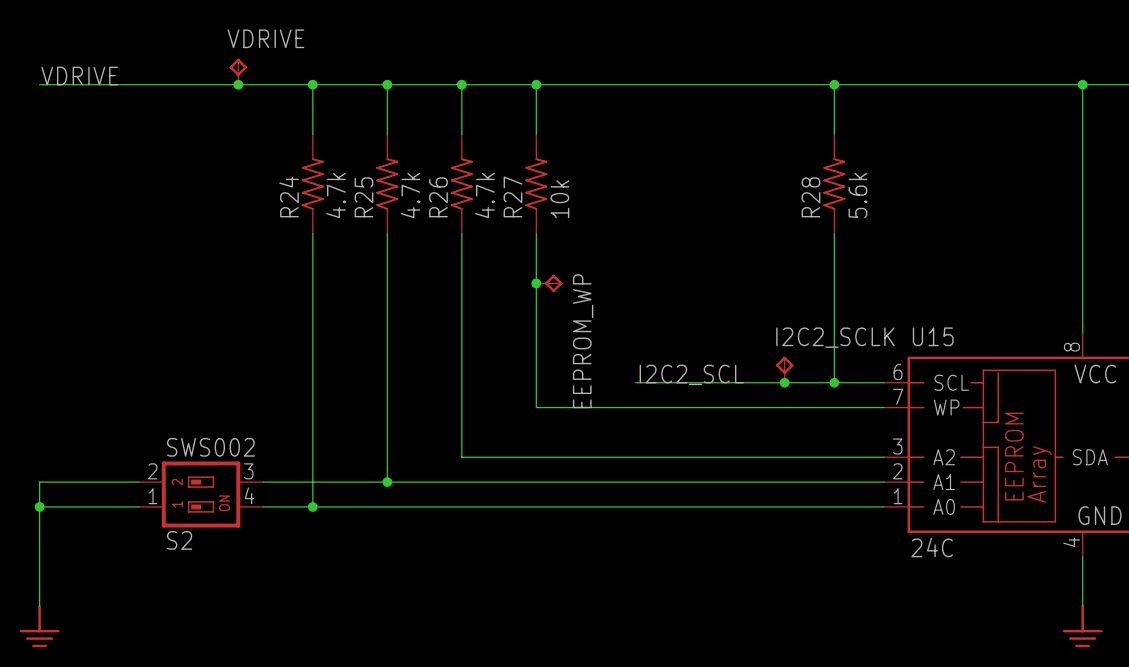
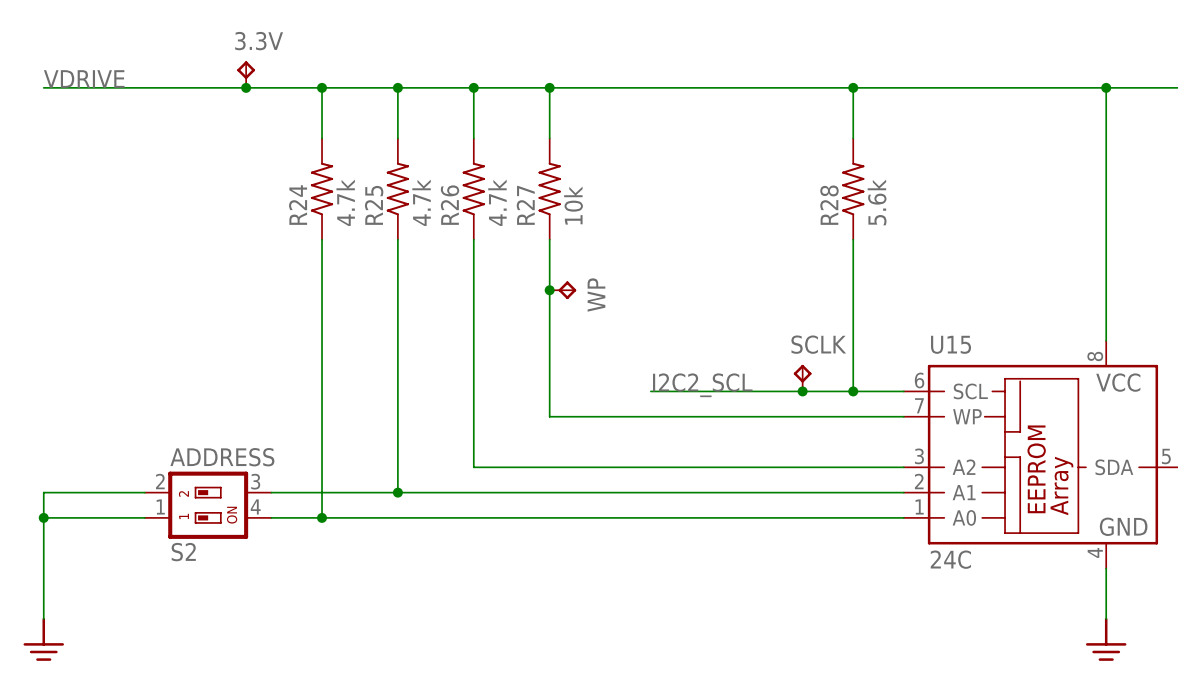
VDRIVE name: VDRIVE (265, 38) -> 3.3V (259, 41)
I2C2_SCLK name: I2C2_SCLK (835, 337) -> SCLK (818, 344)
EEPROM_WP name: EEPROM_WP (583, 341) -> WP (596, 295)
S2 value: SWS002 (210, 447) -> ADDRESS (222, 457)

